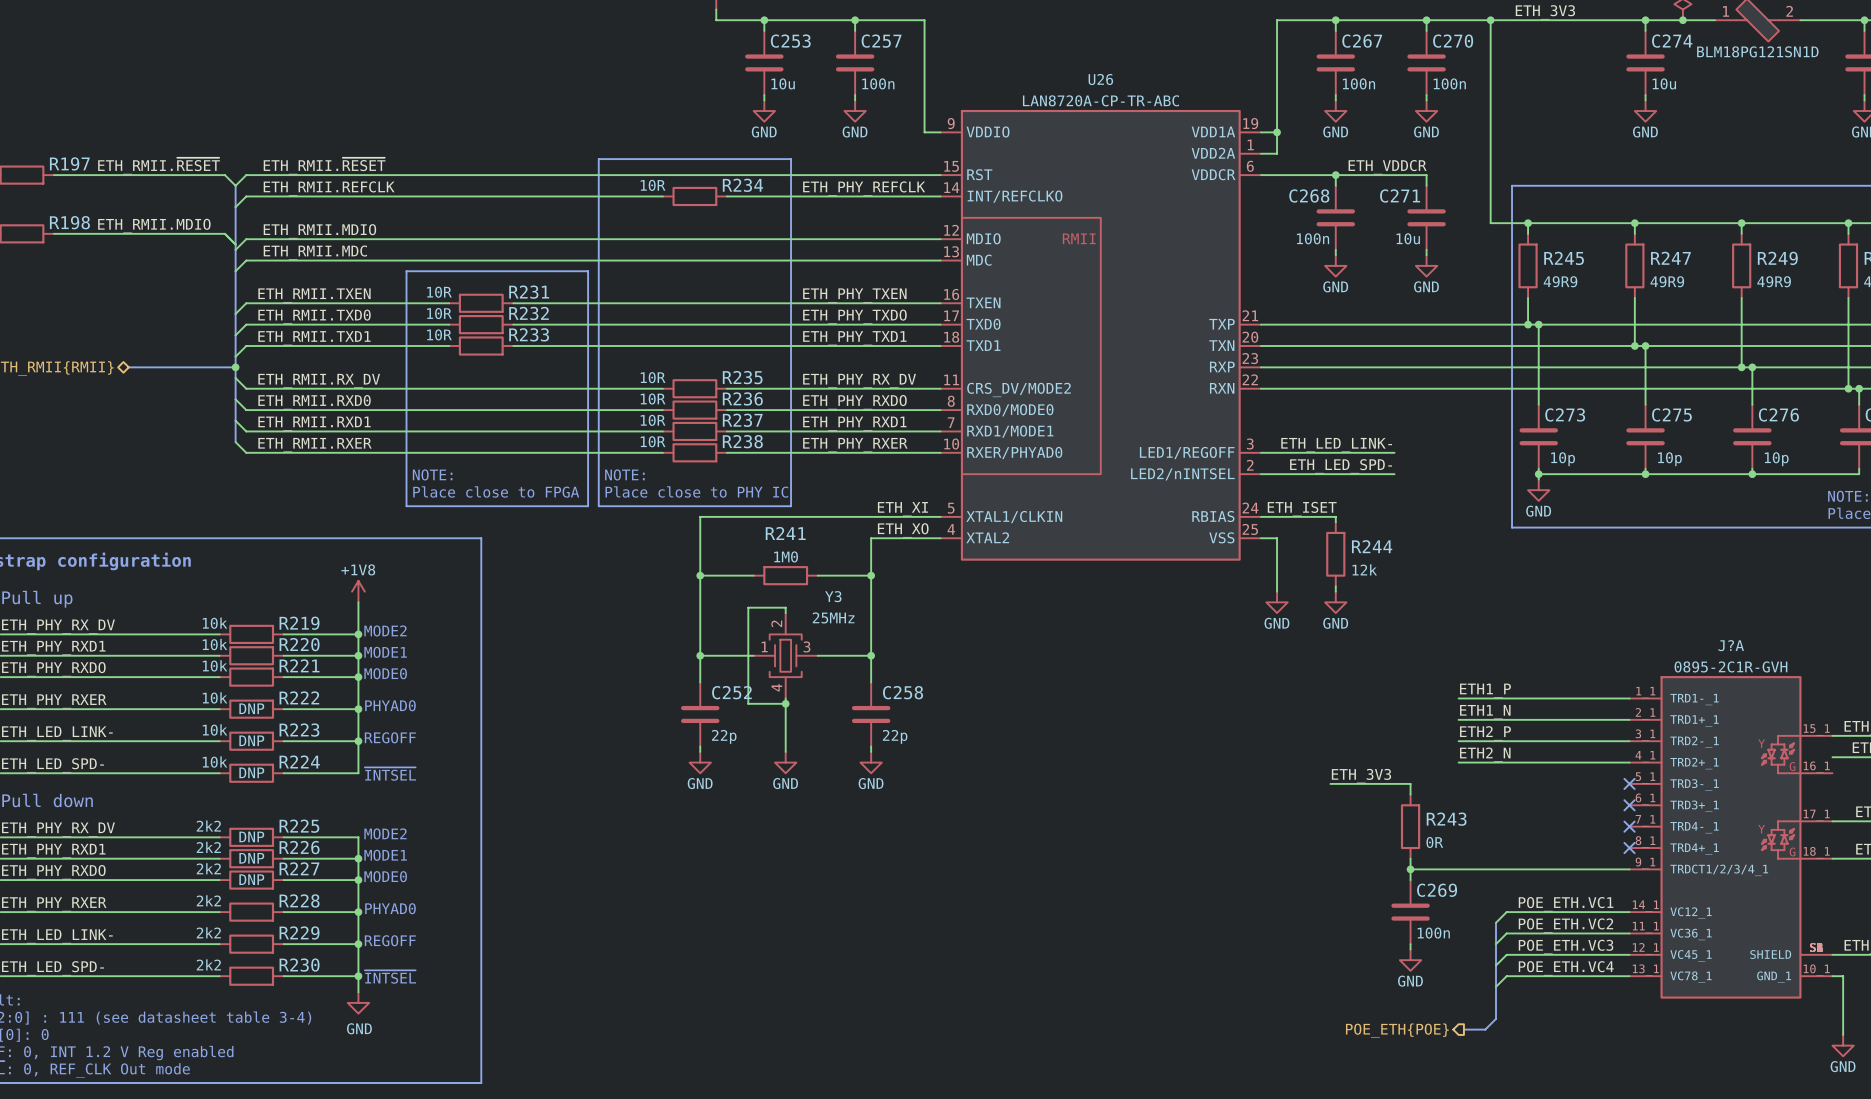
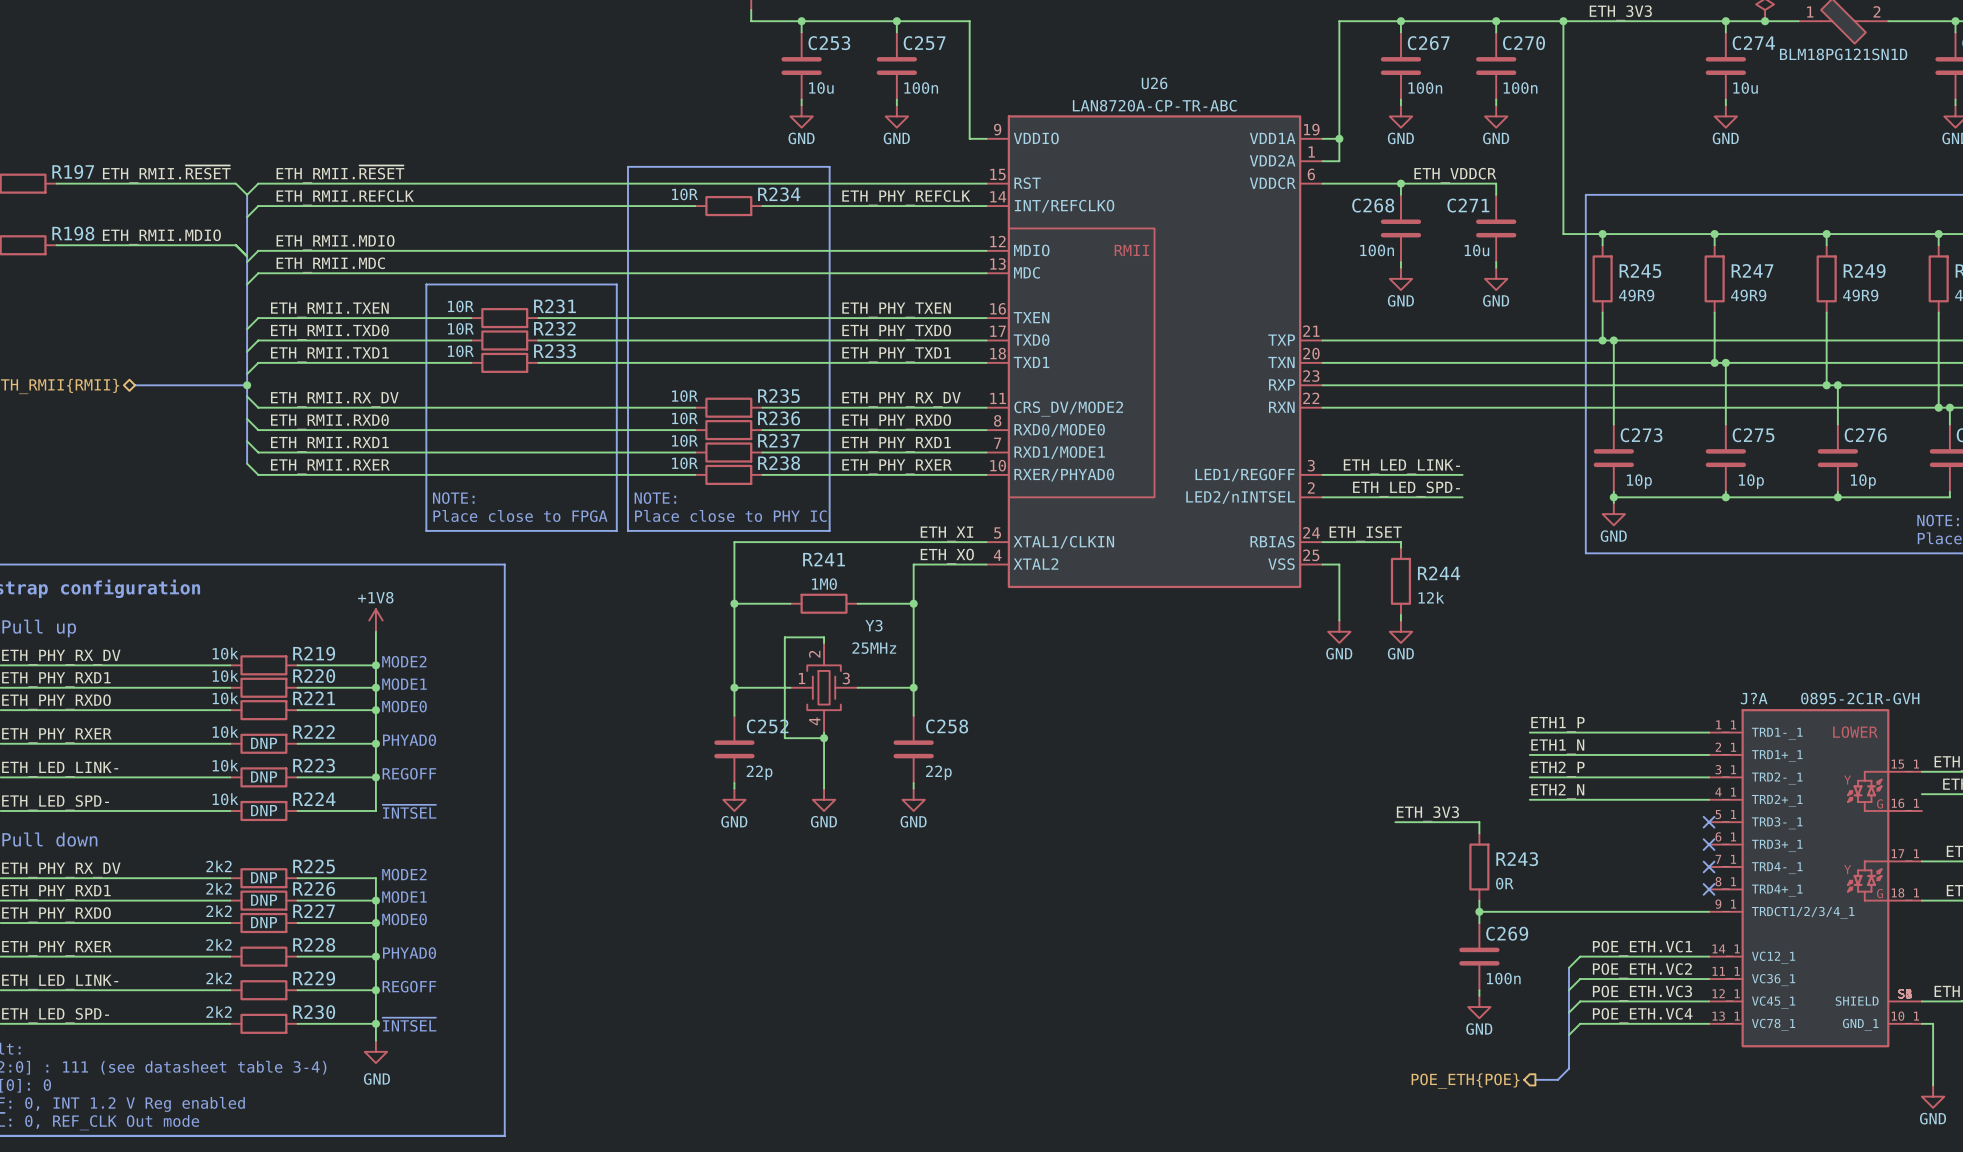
J?A name position: J?A (1731, 645) -> J?A (1754, 698)
J?A value position: 0895-2C1R-GVH (1730, 666) -> 0895-2C1R-GVH (1860, 698)
J?A text: none -> LOWER (1855, 732)

